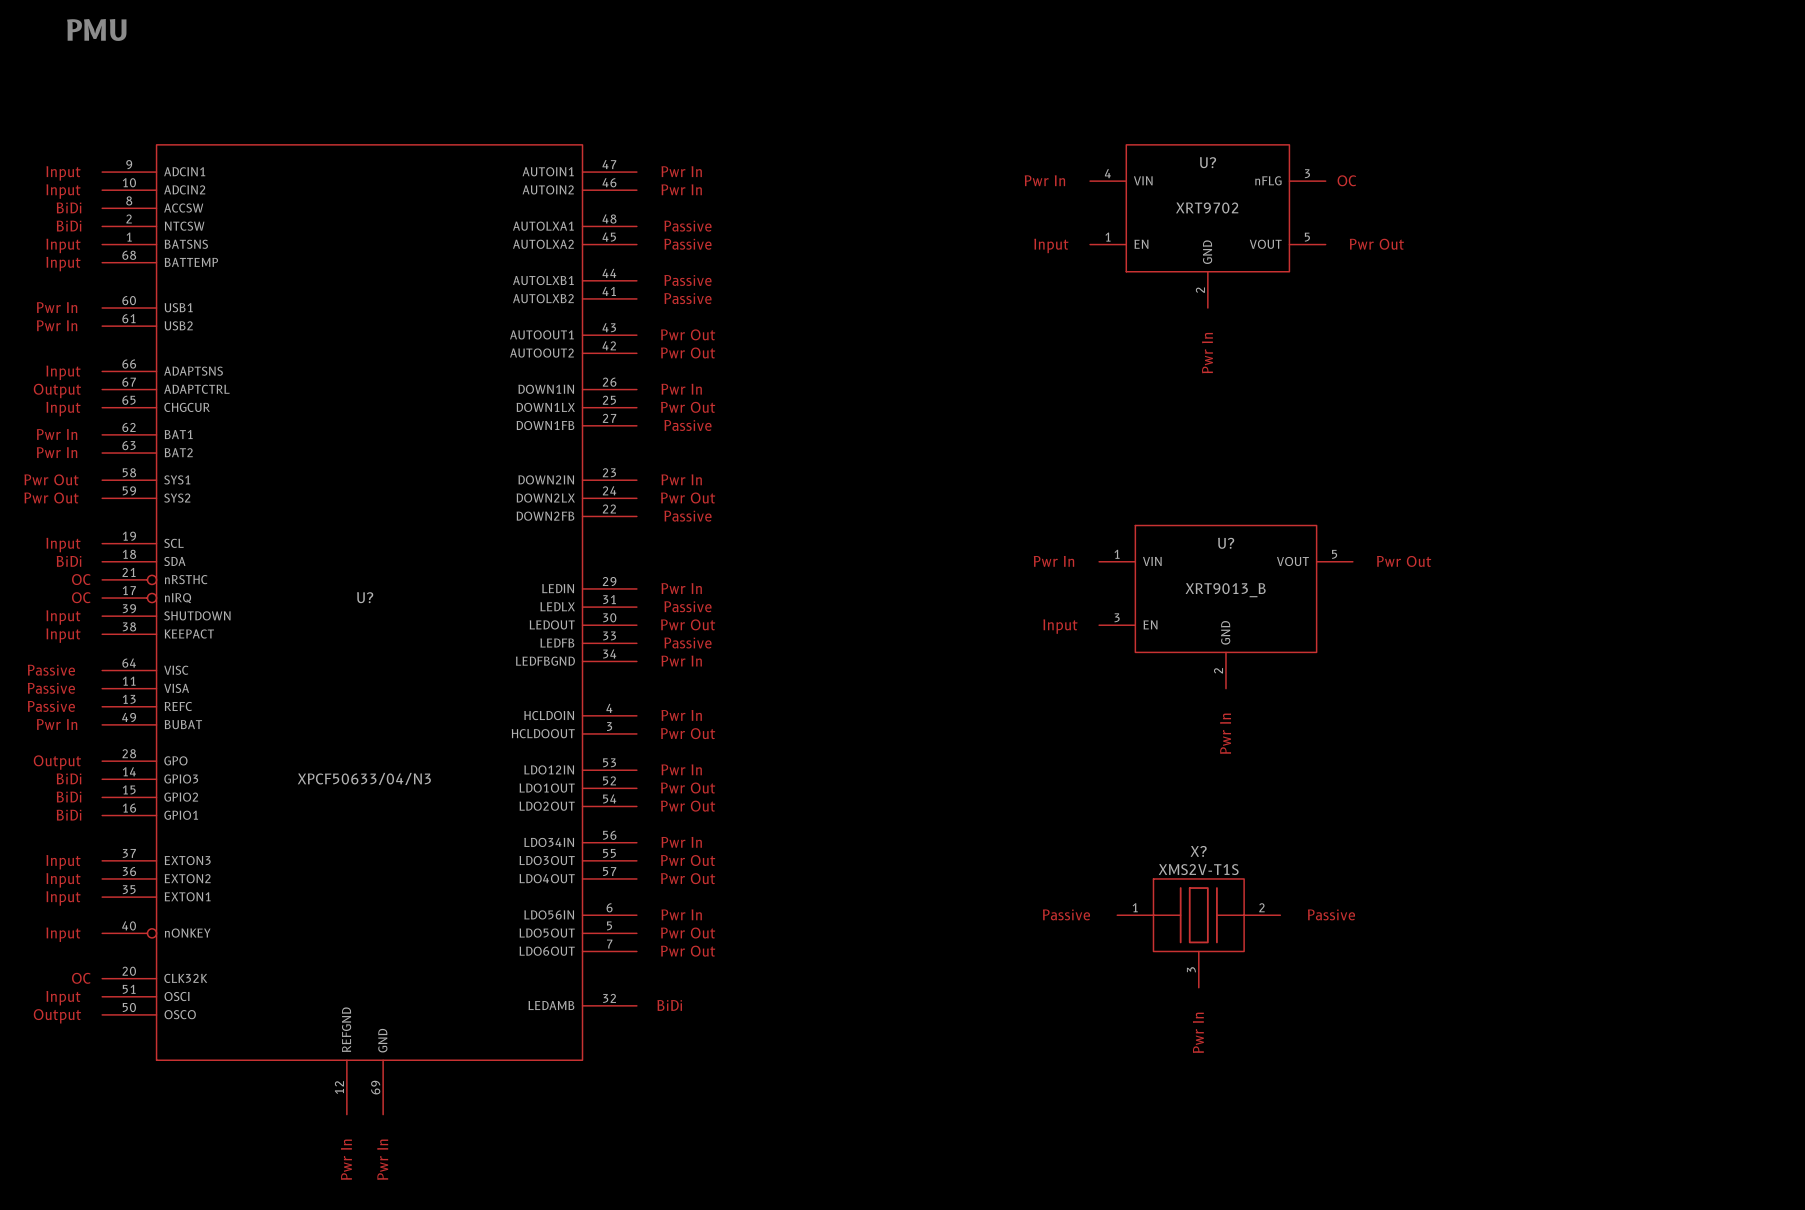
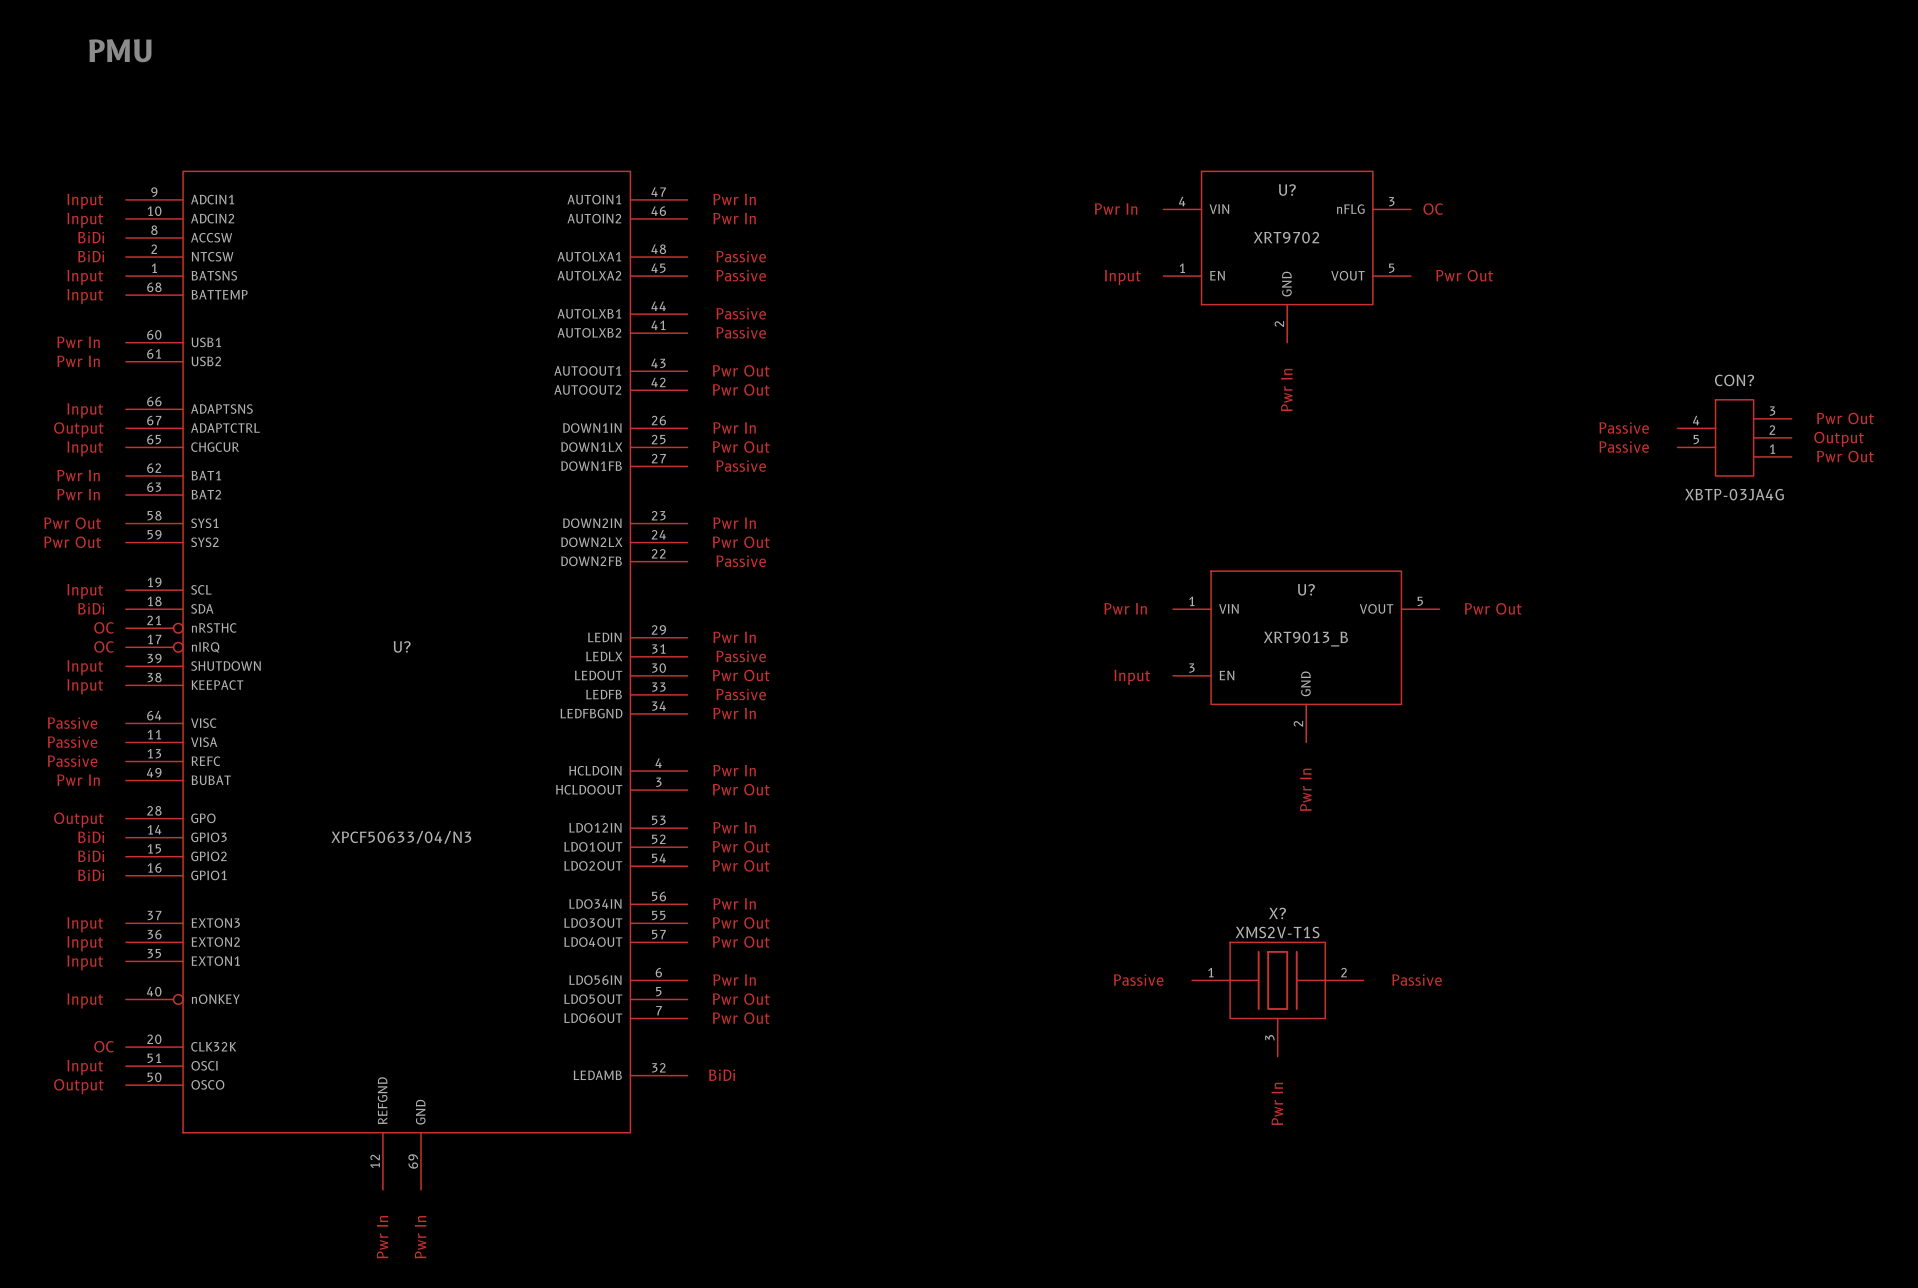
CON?: none -> XBTP-03JA4G (1734, 437)

